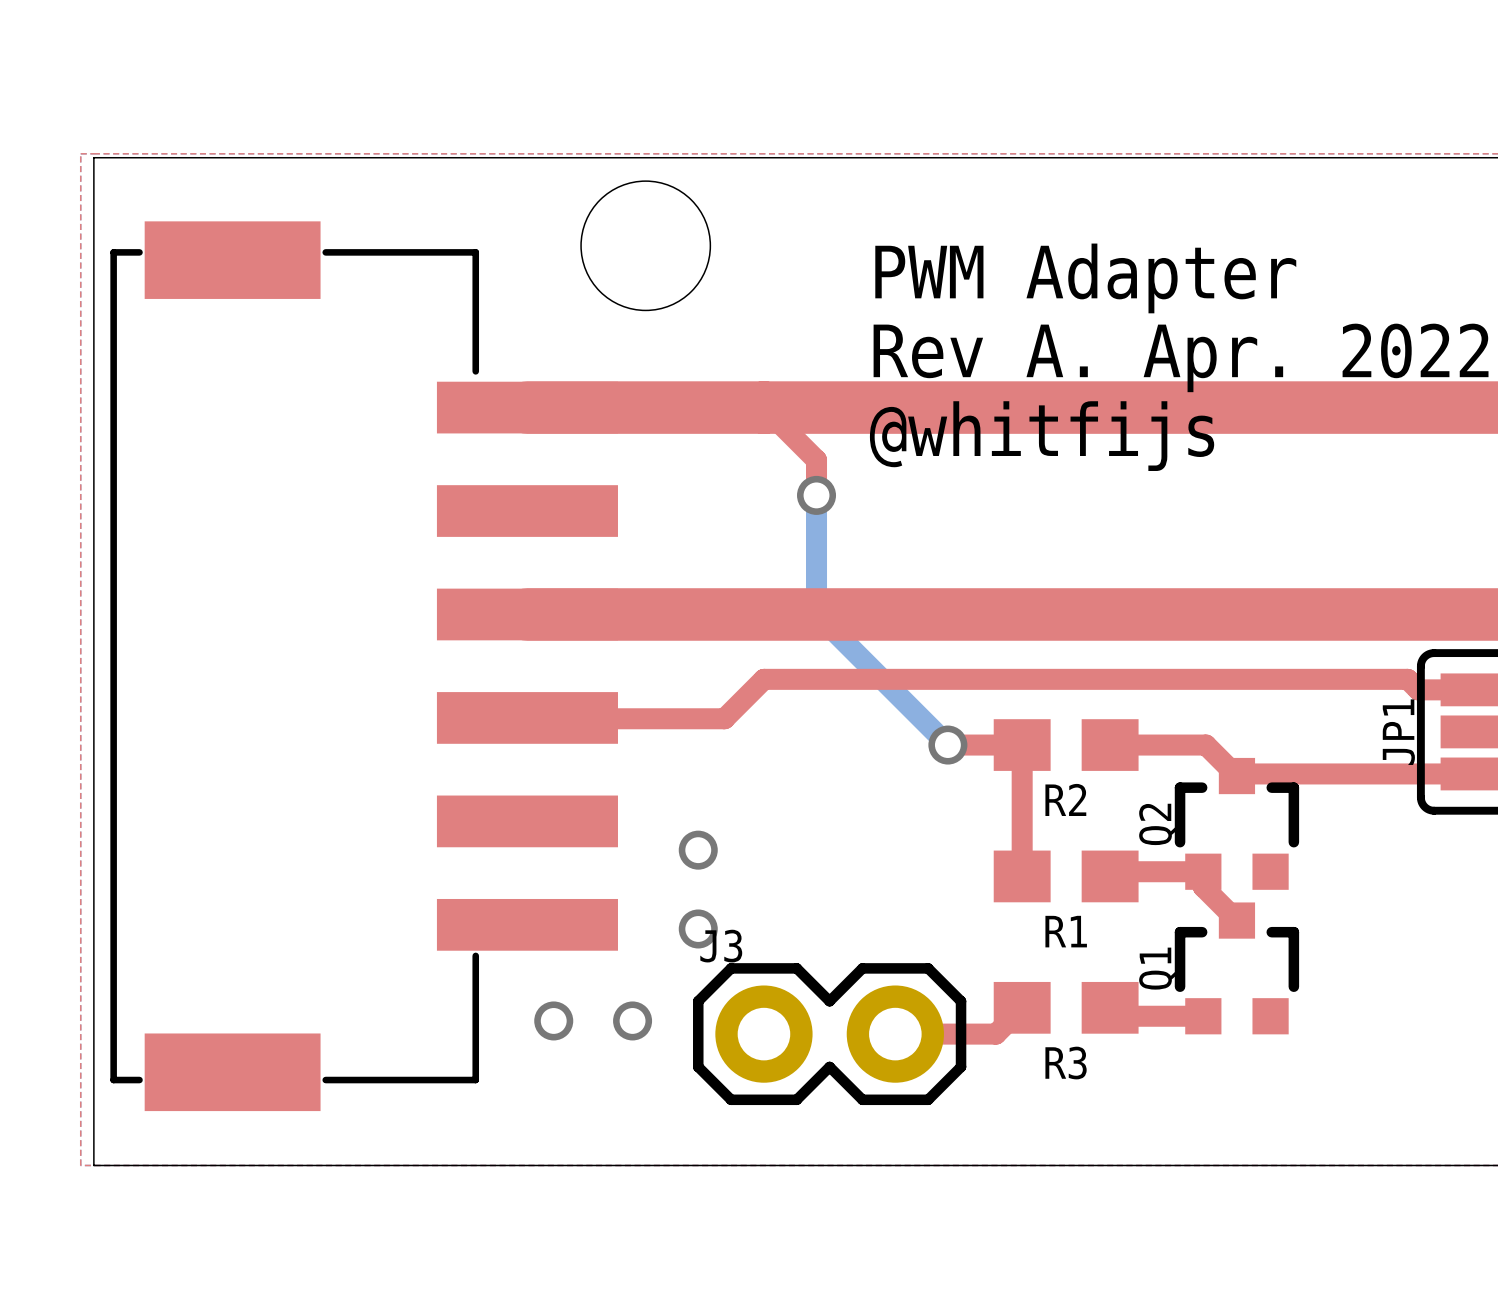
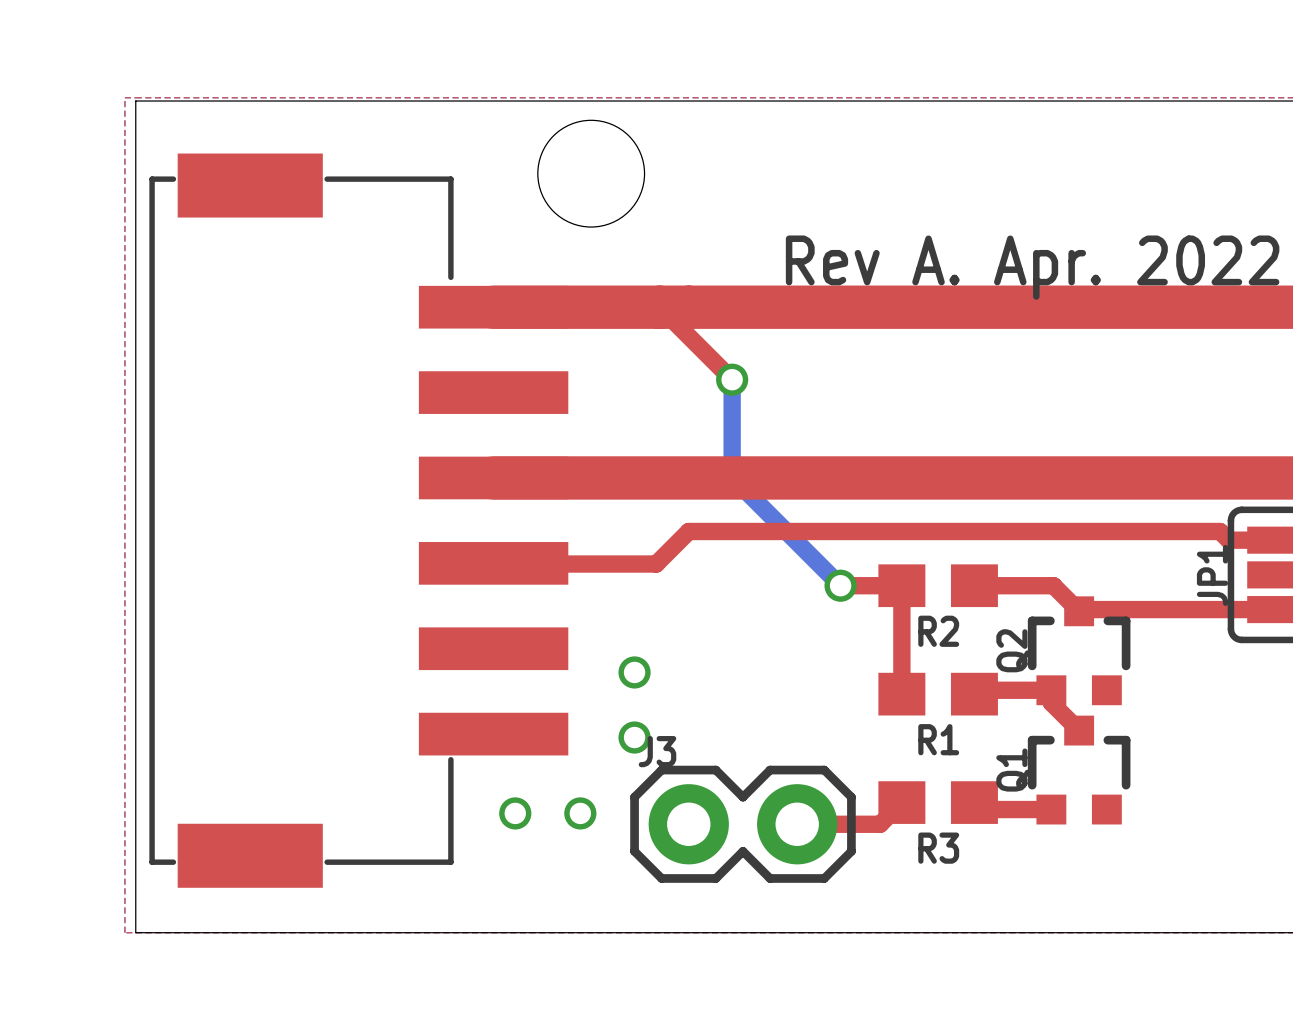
text: PWM Adapter (1085, 278) -> none
top track: (763, 407) (816, 460) (816, 495) -> (659, 307) (732, 379)
text: @whitfijs (1042, 436) -> none

